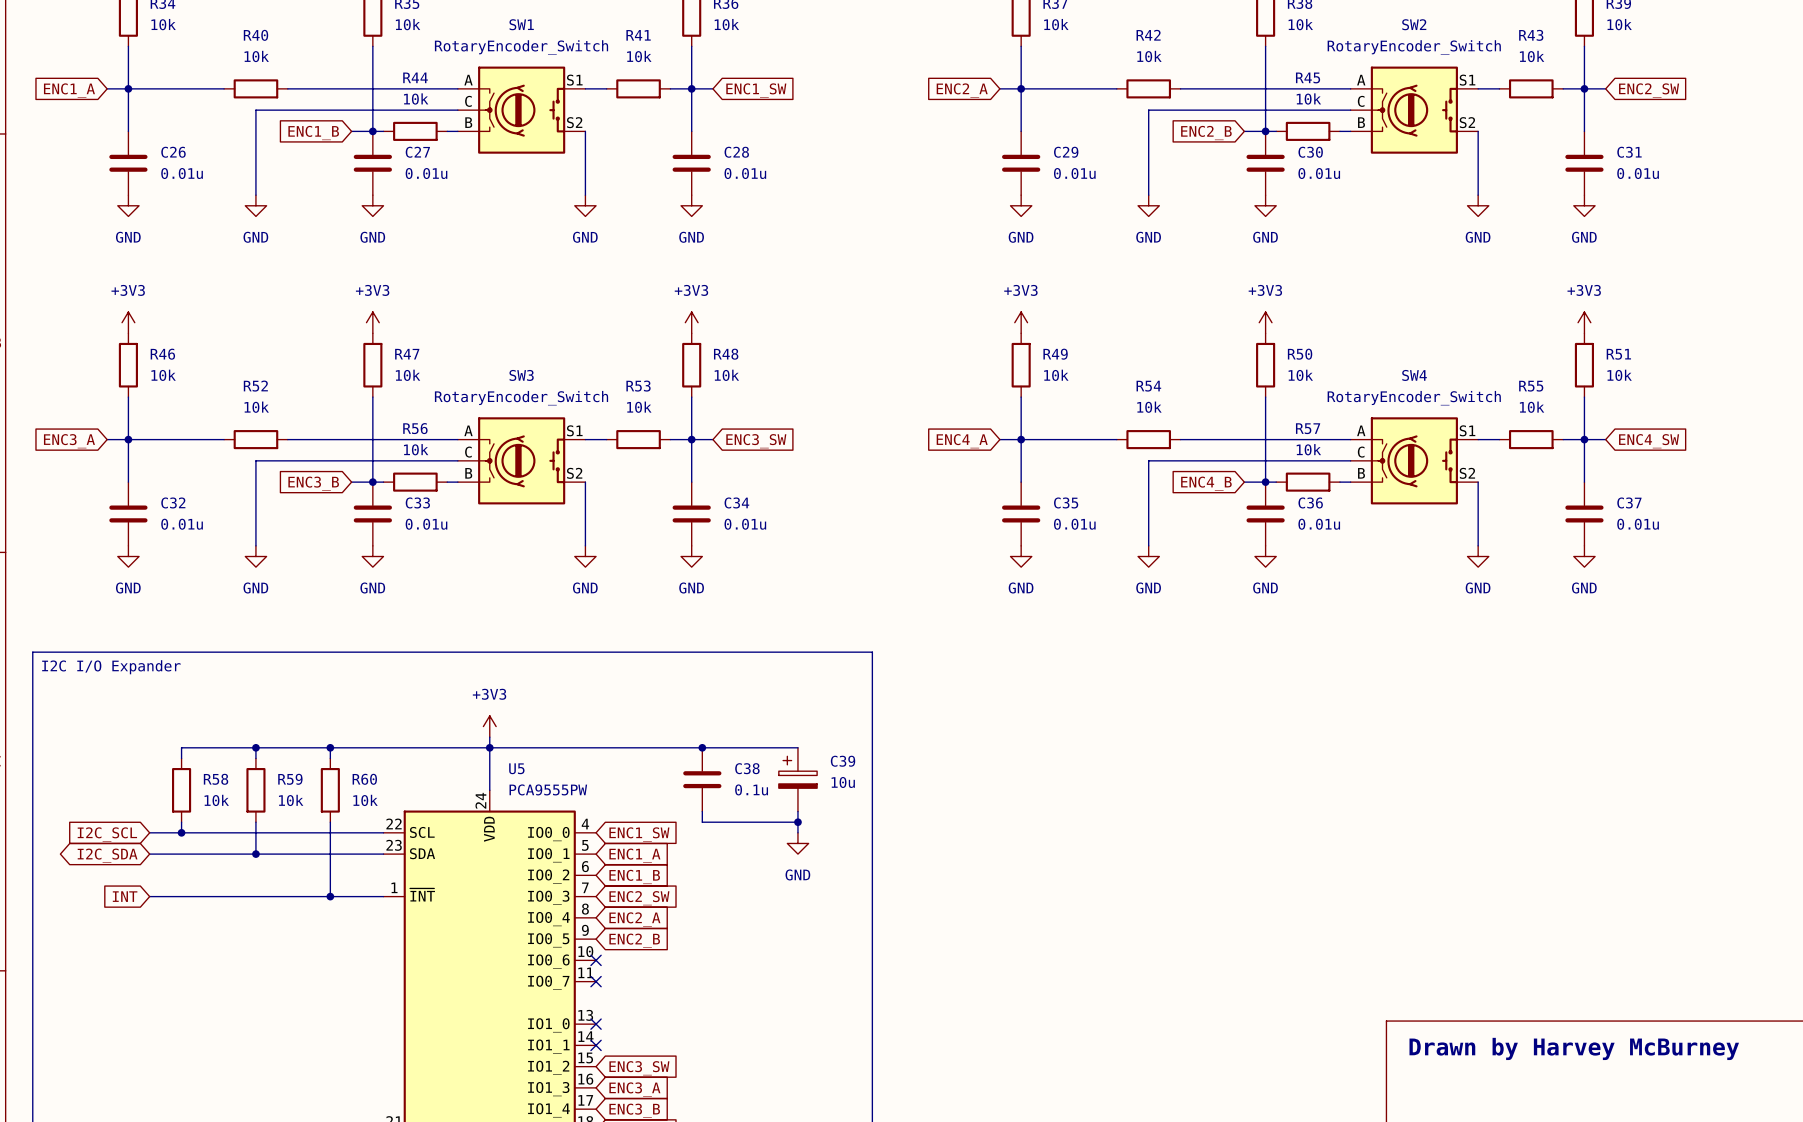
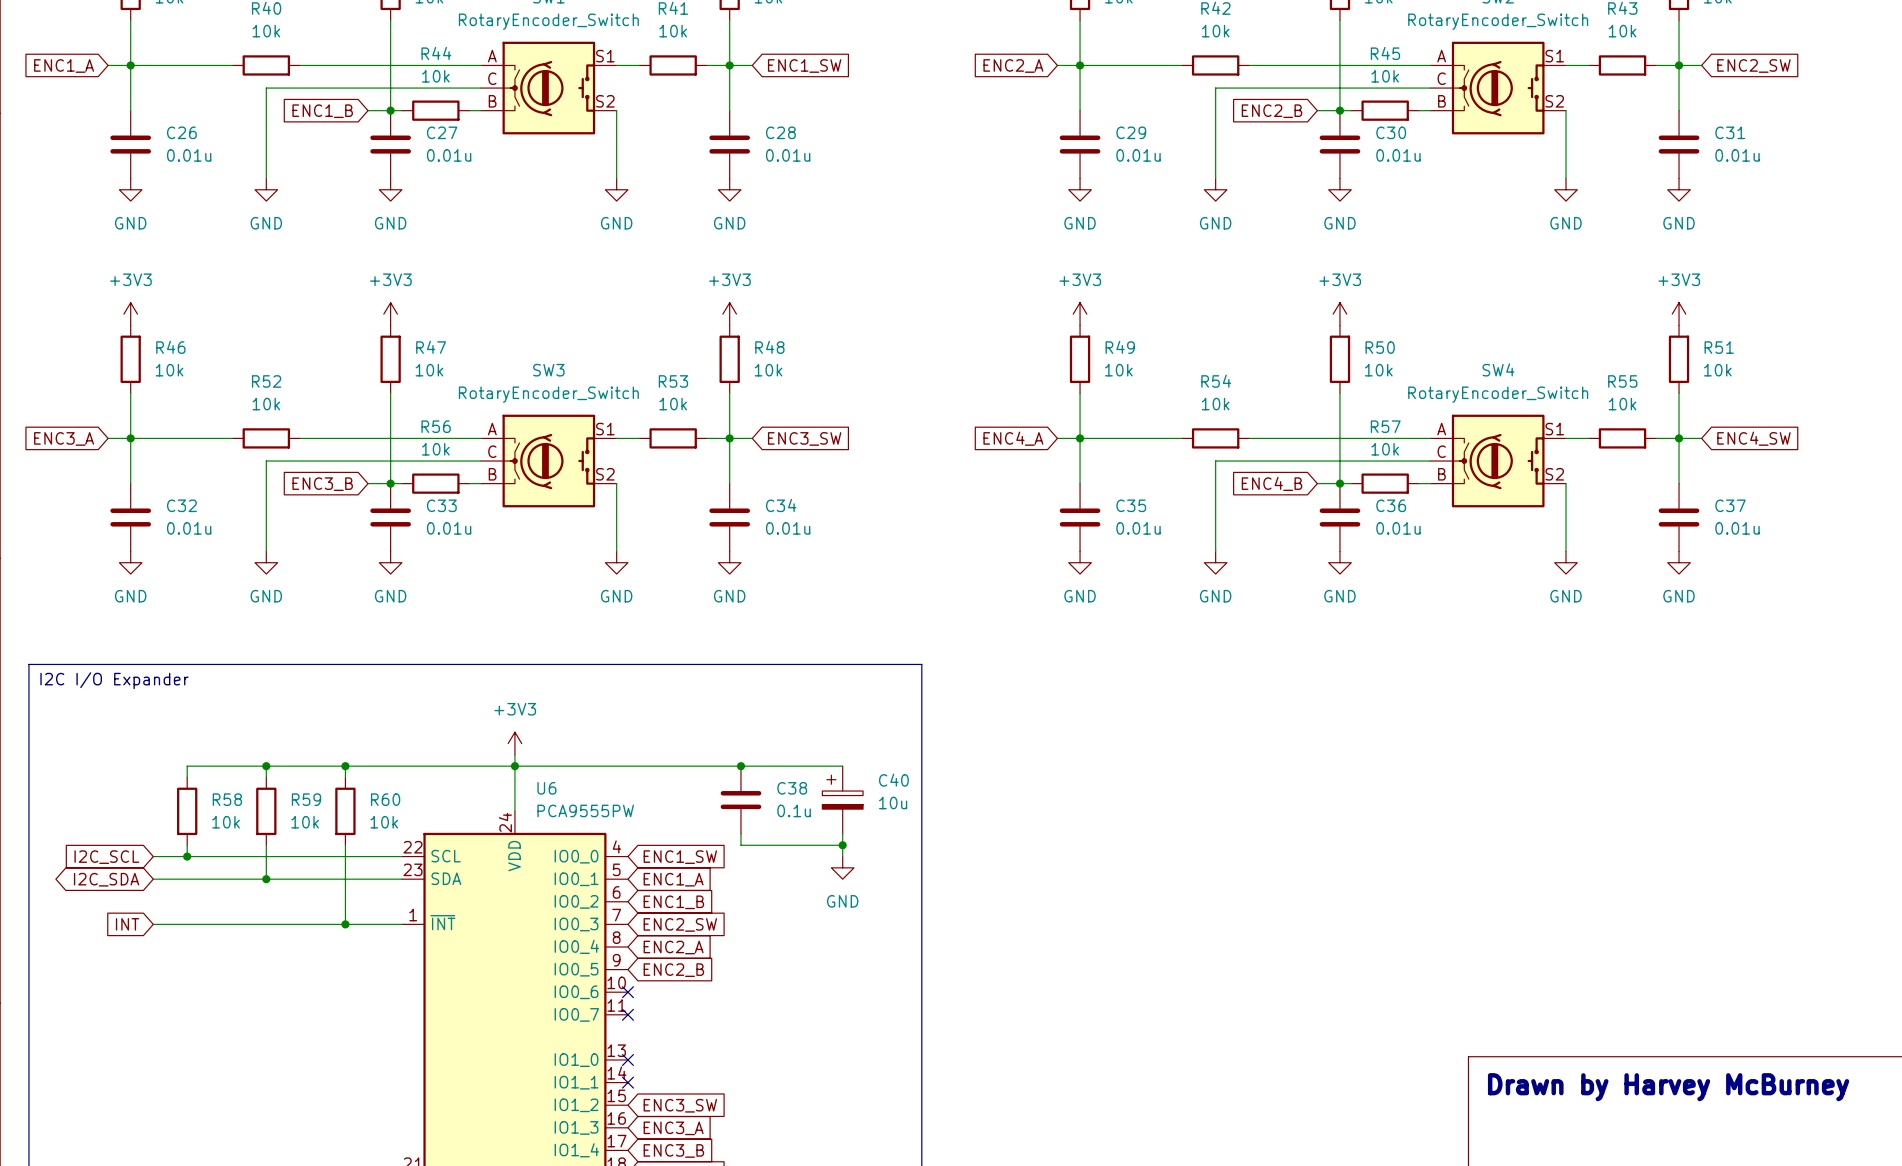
C39 name: C39 (843, 761) -> C40 (893, 780)
U5 name: U5 (516, 768) -> U6 (546, 788)

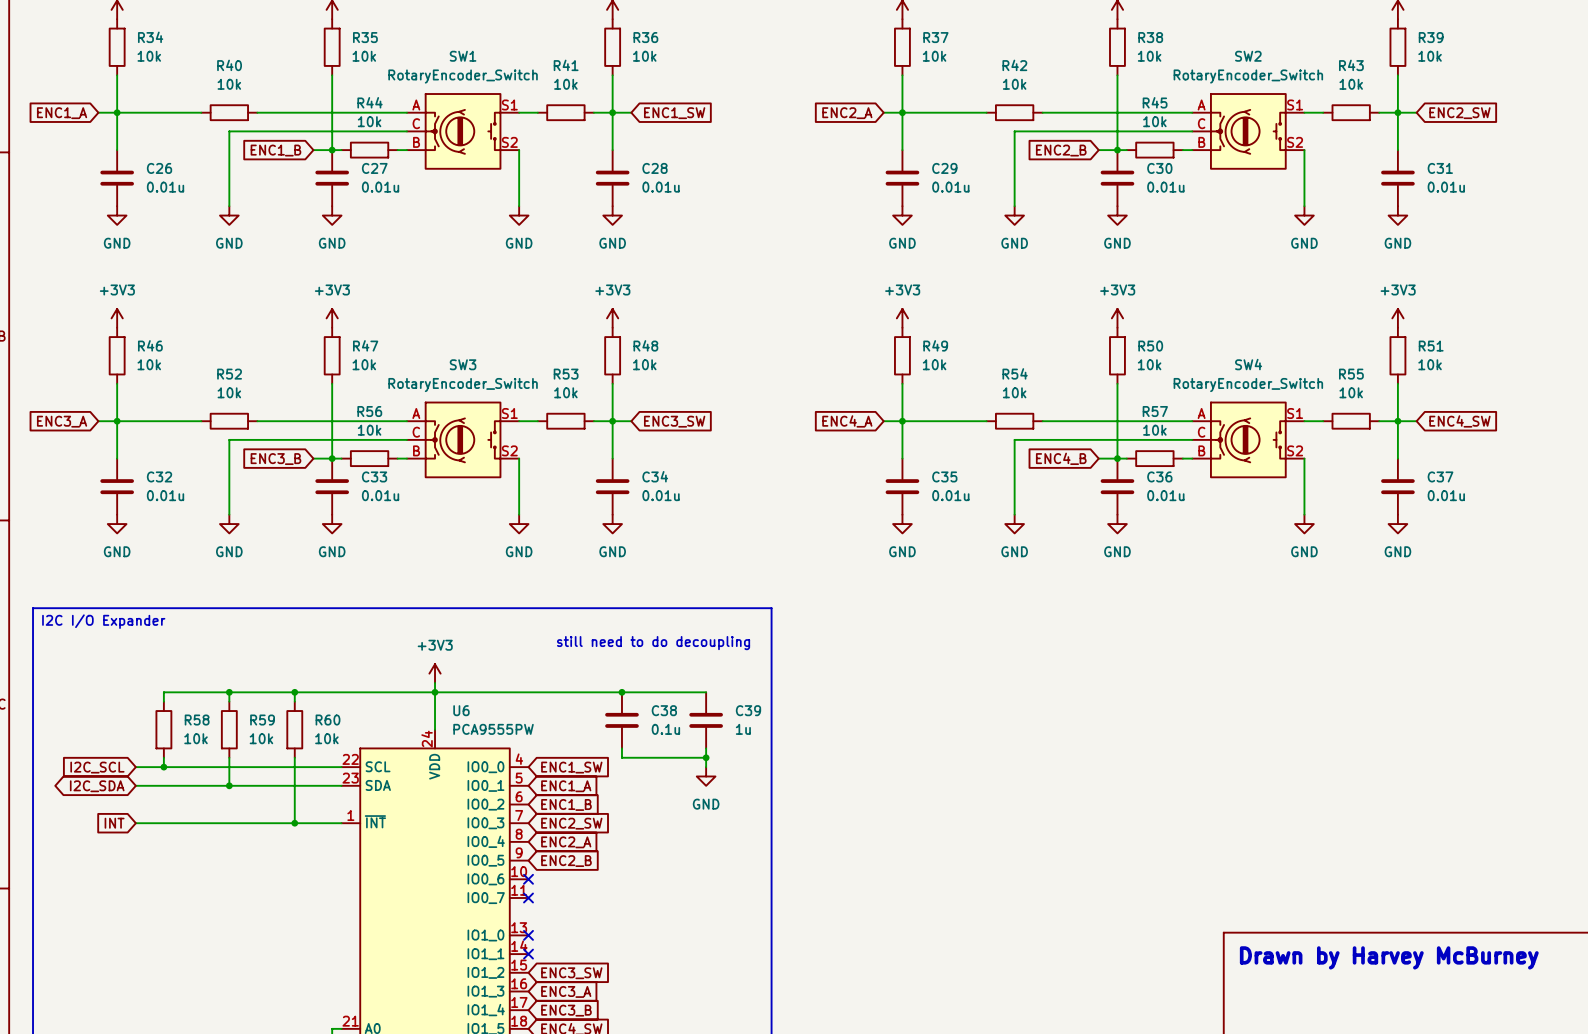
text: none -> still need to do decoupling (653, 643)
C40: 10u (842, 800) -> none
C39: none -> 1u (706, 720)

